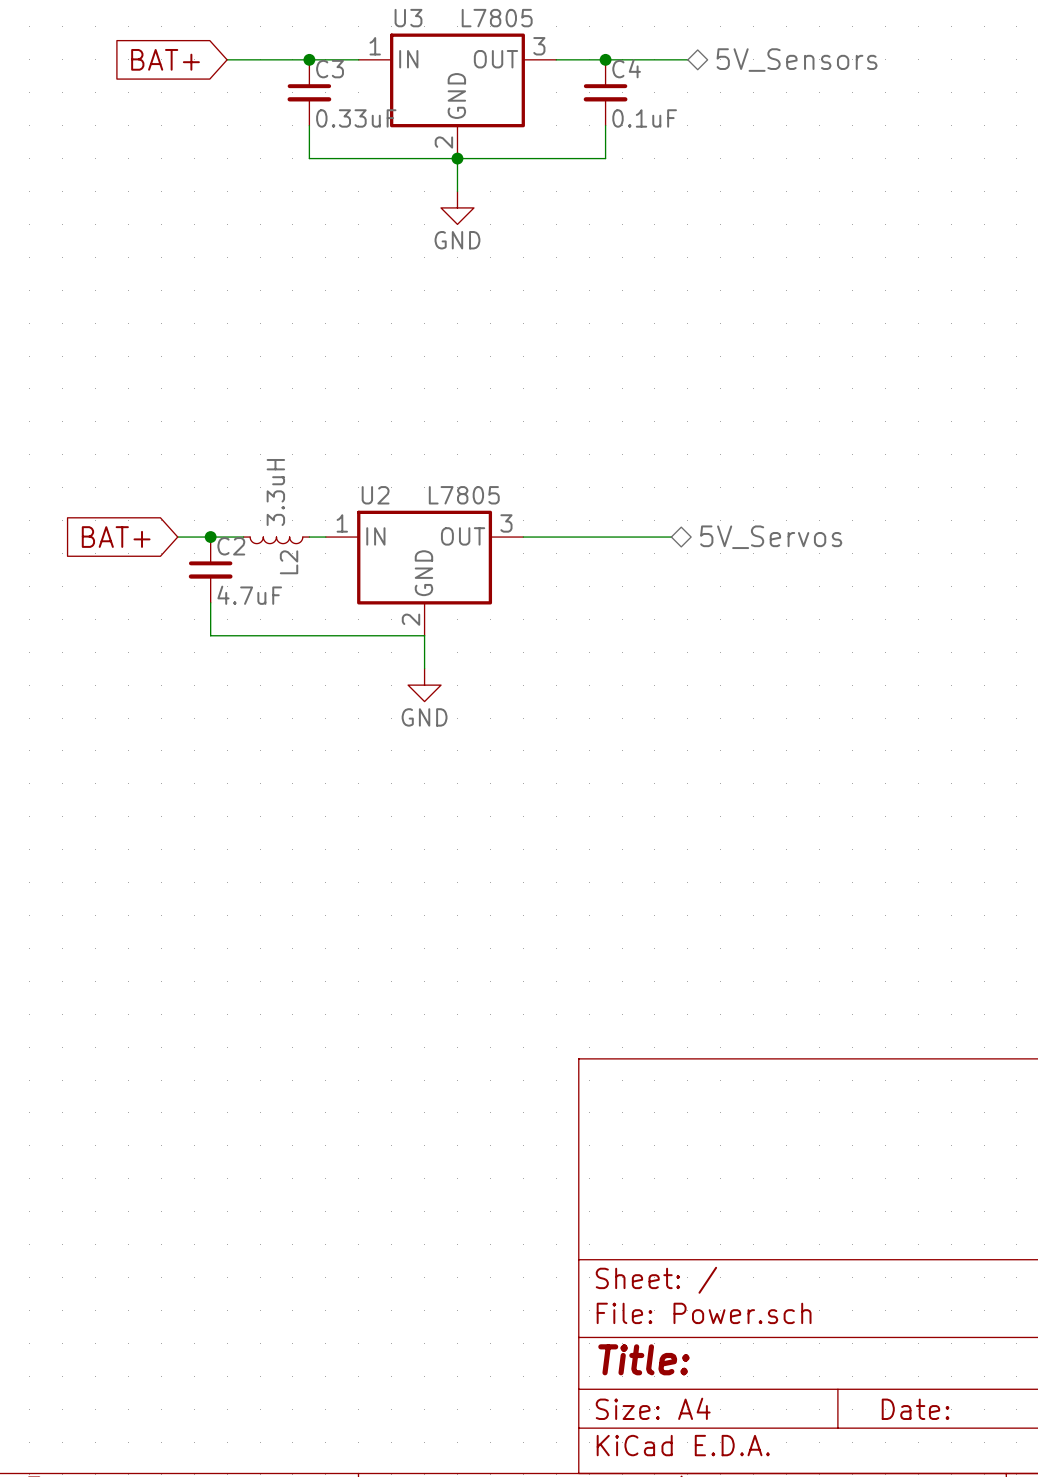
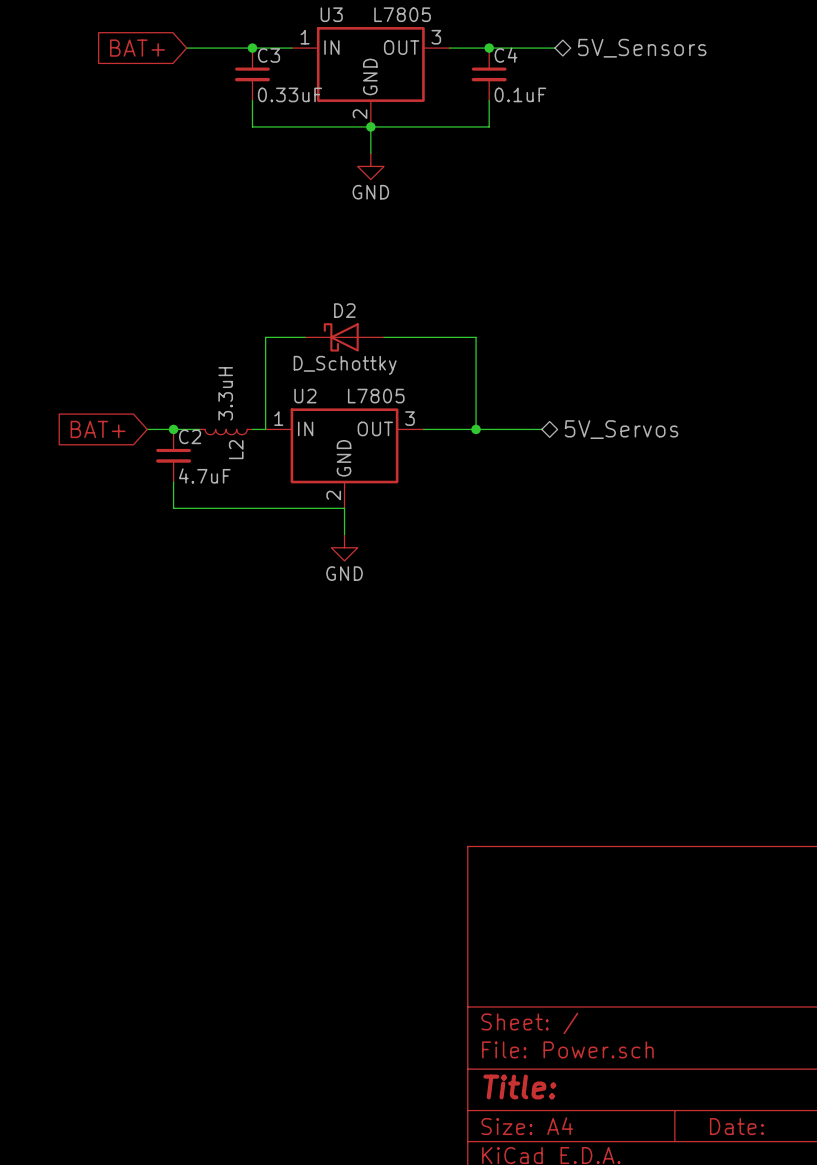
wire: none -> (305, 337) (265, 337) (265, 429)
D2: none -> D_Schottky (344, 337)
wire: none -> (383, 337) (476, 337) (476, 429)
junction: none -> (476, 429)

